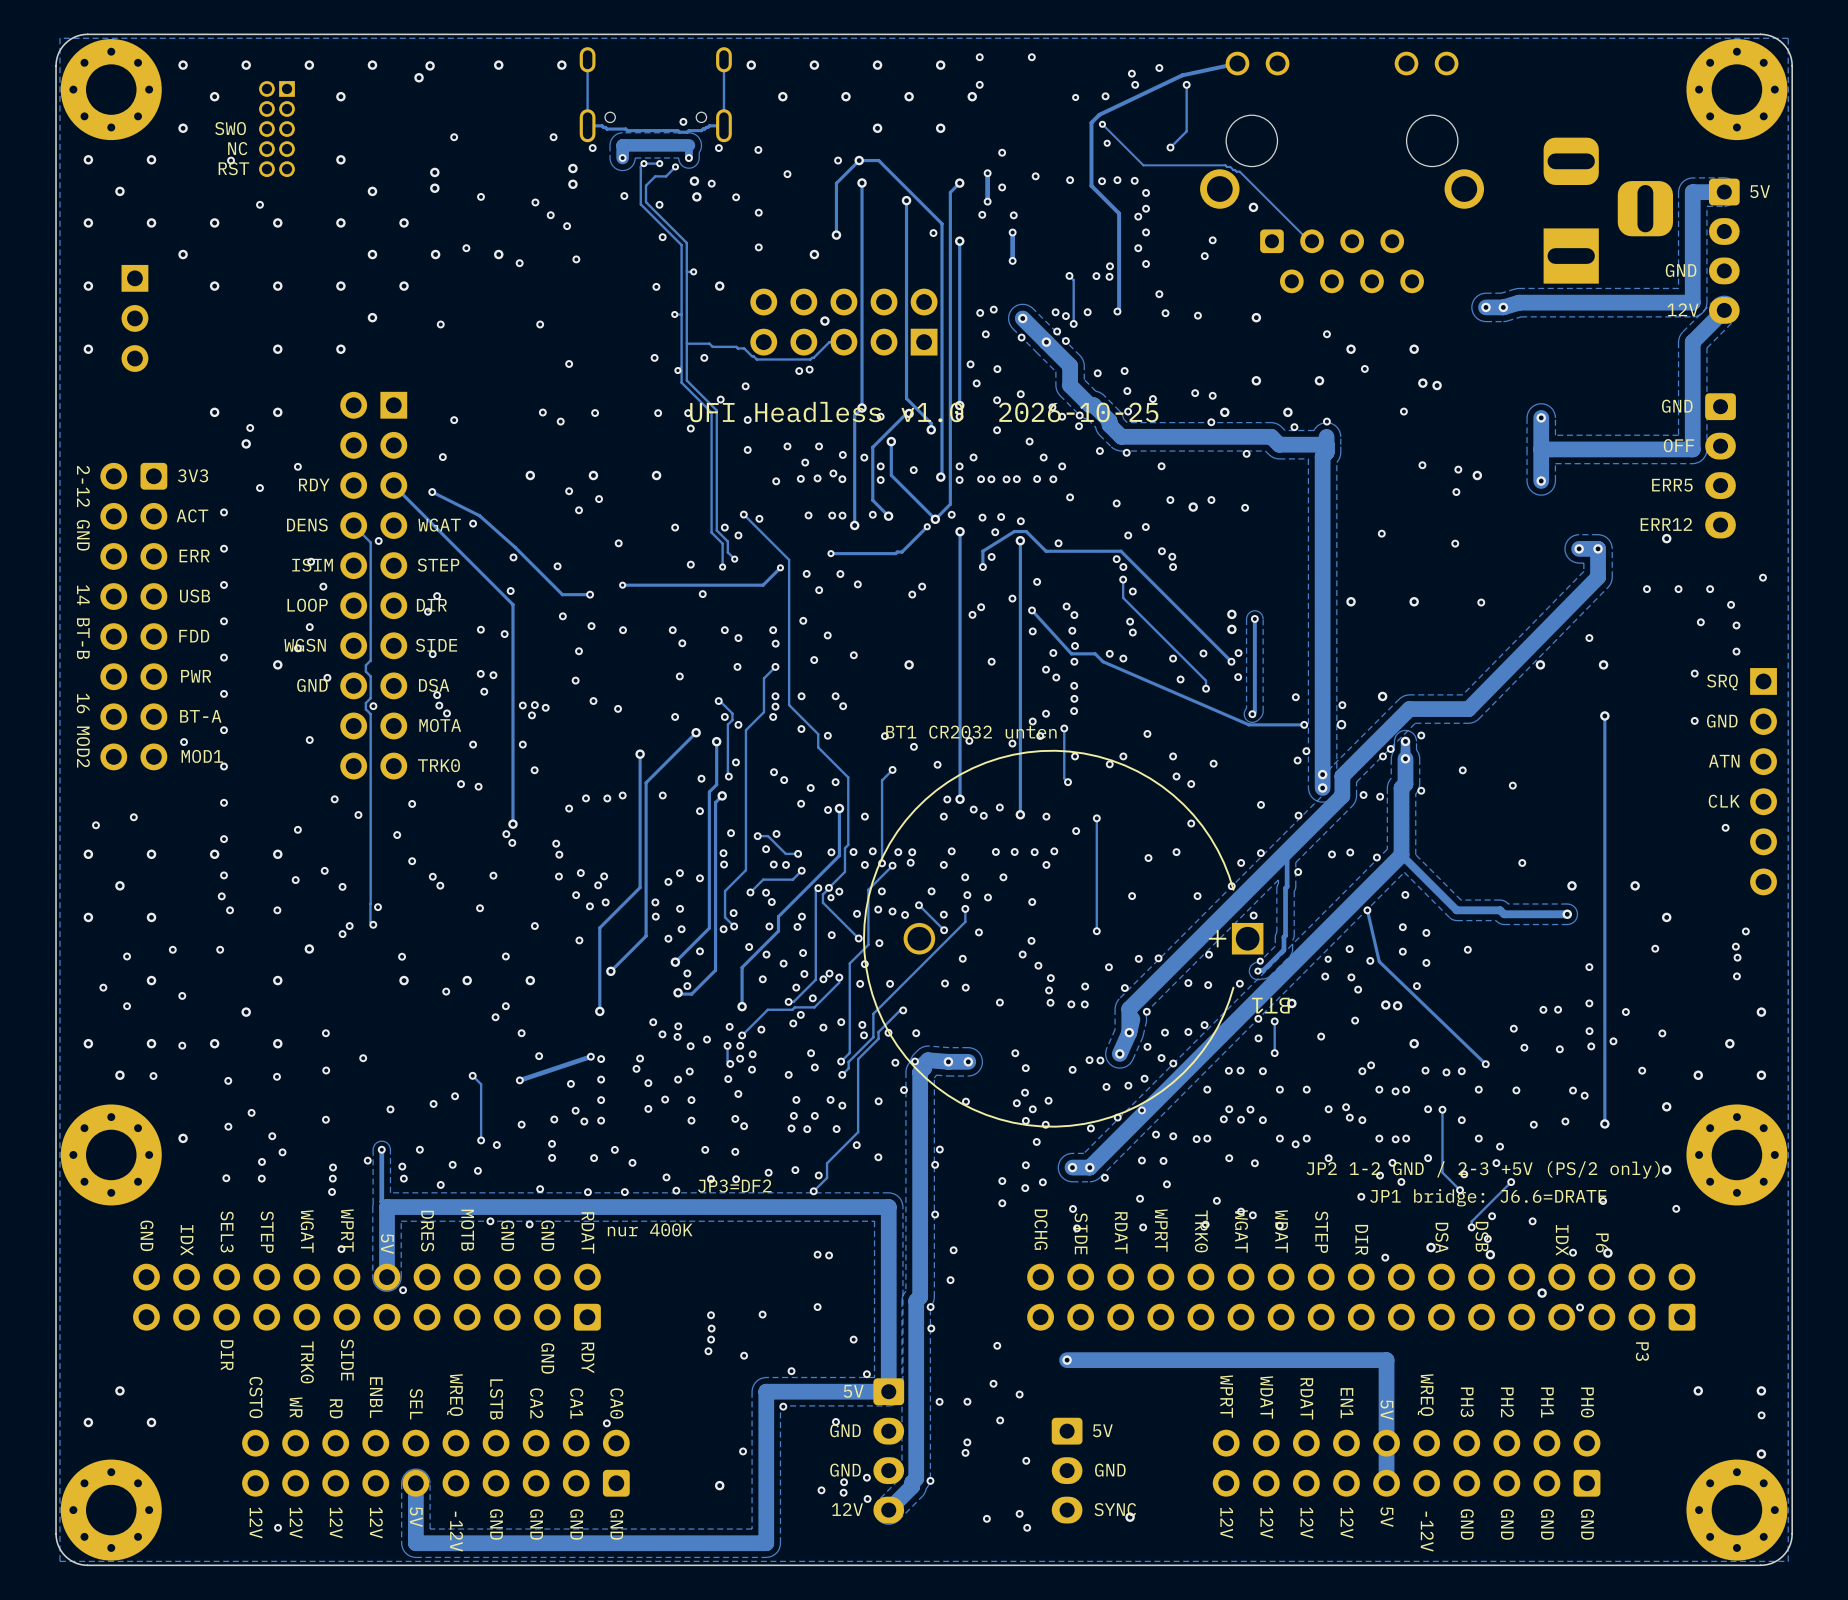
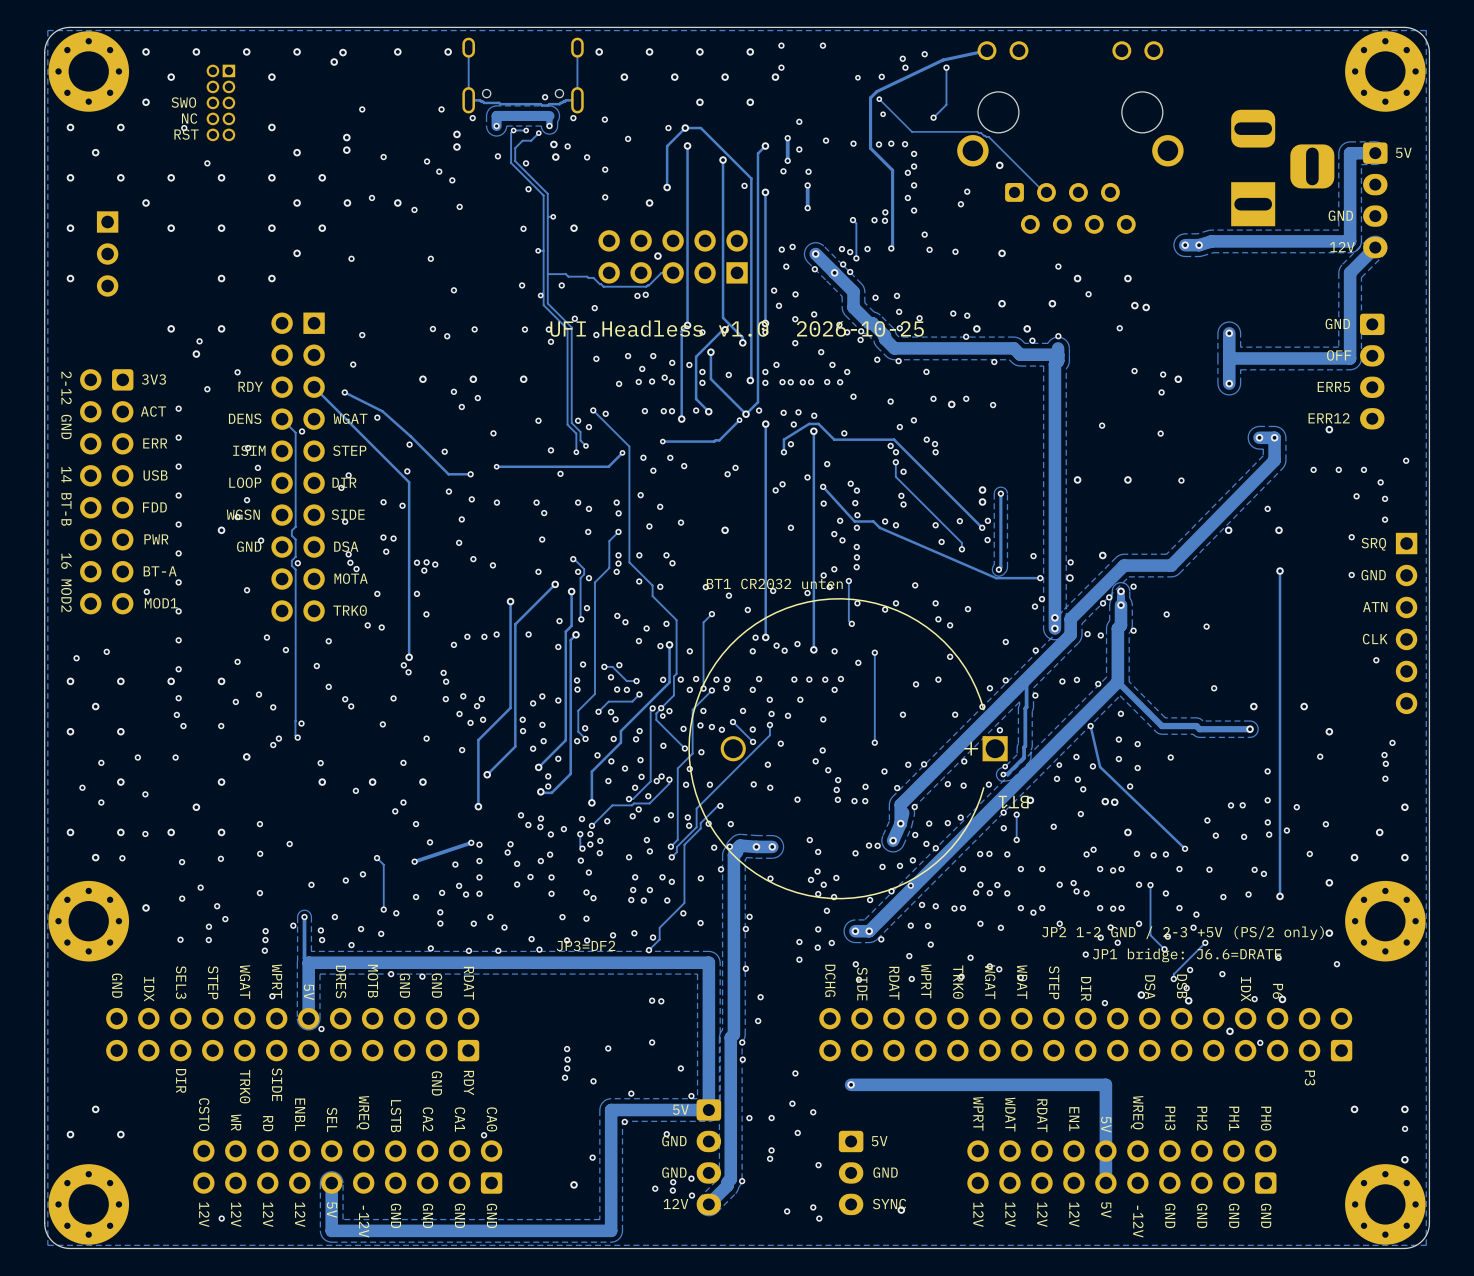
text: nur 400K (650, 1229) -> none

